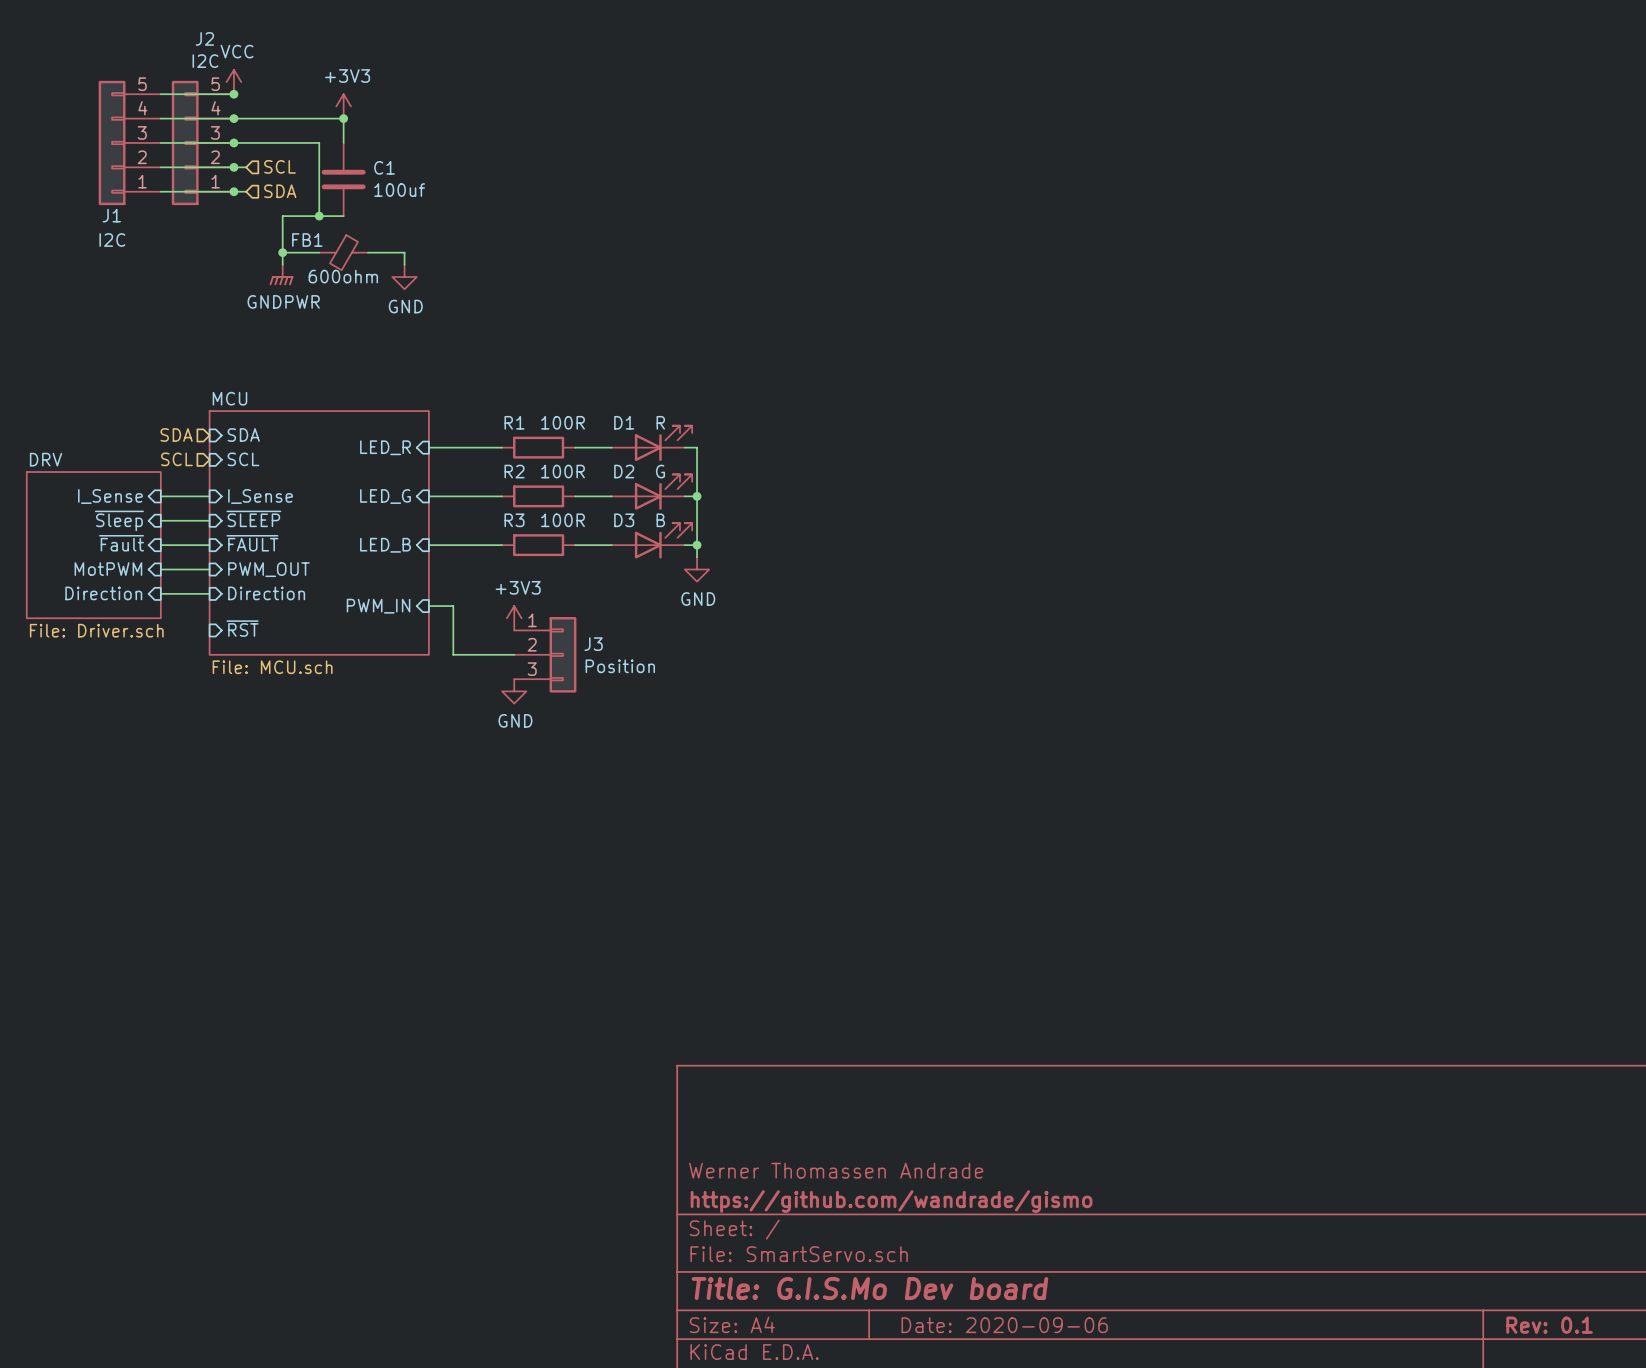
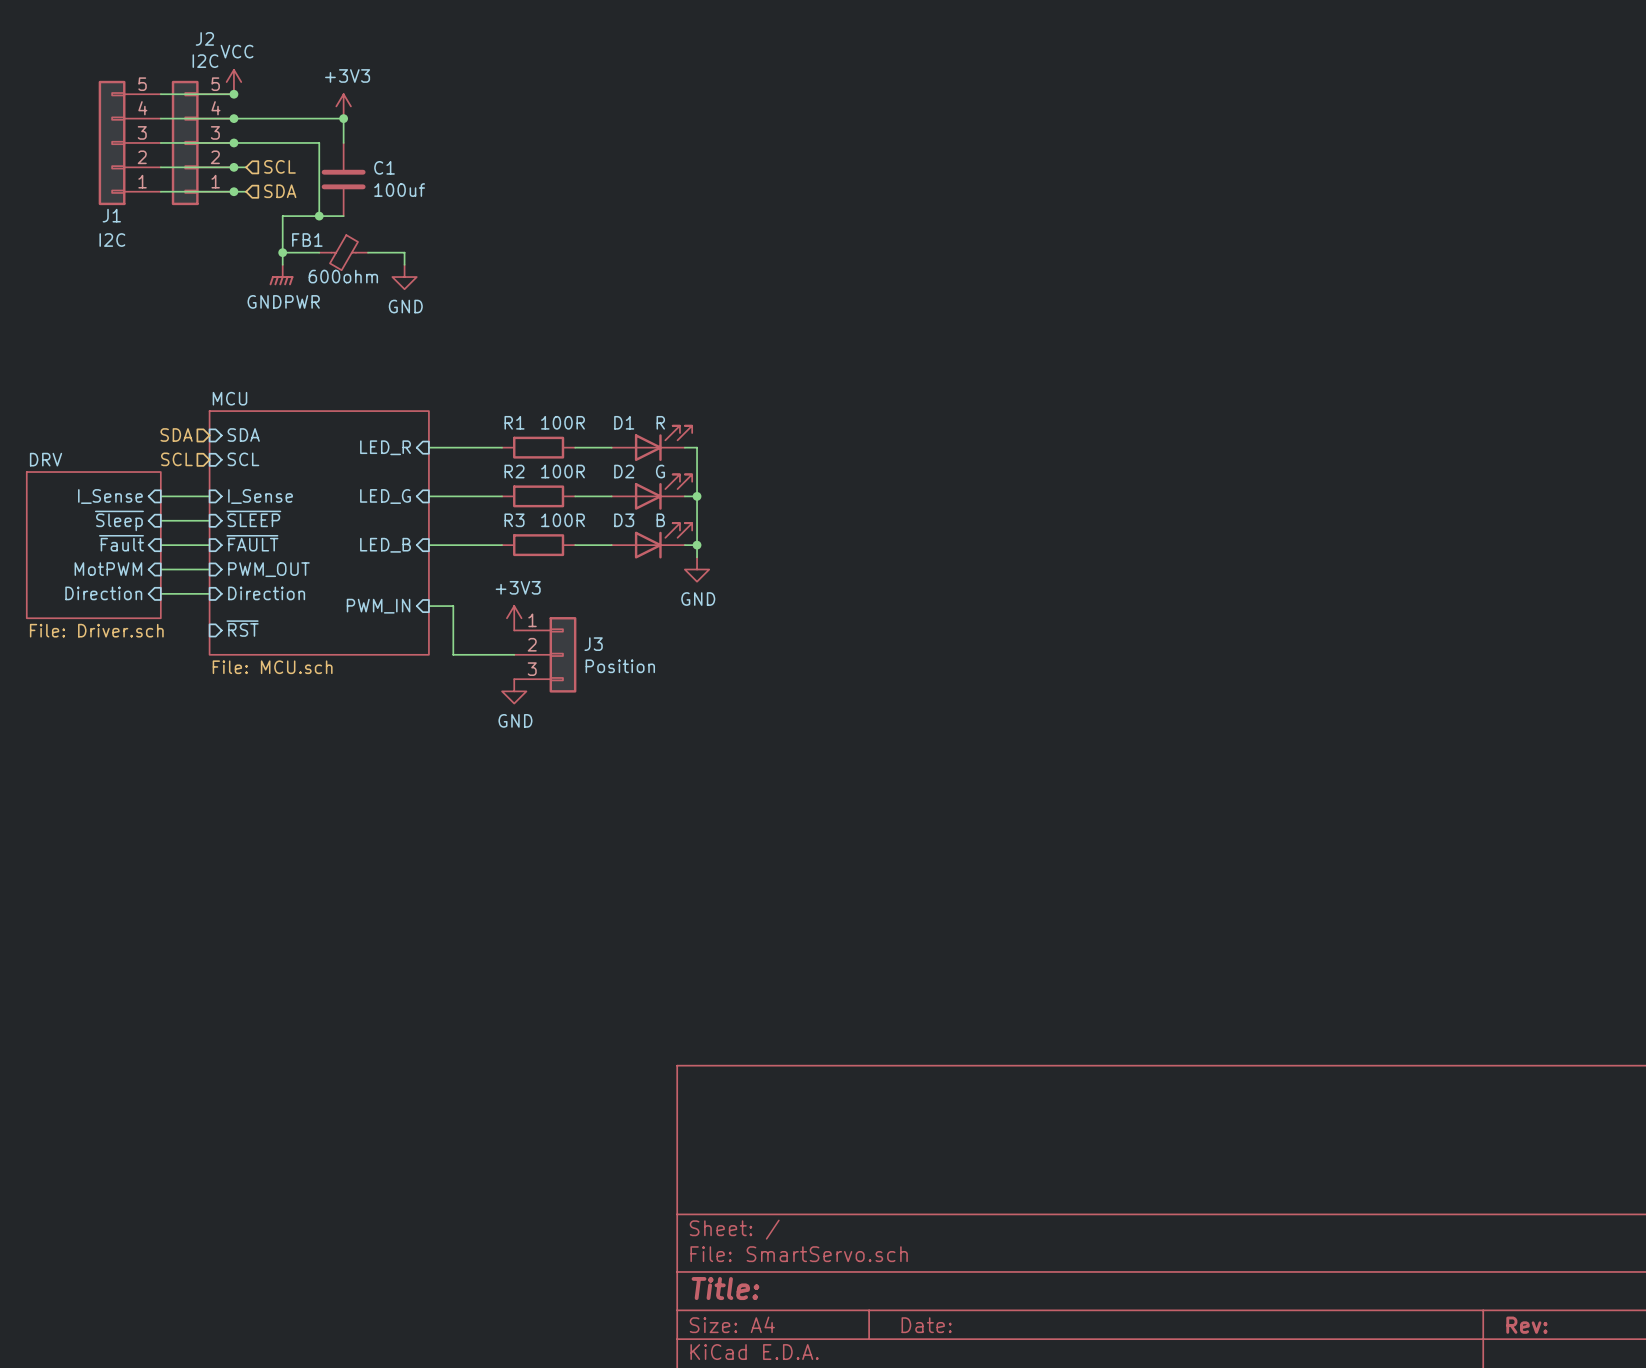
title block: Werner Thomassen Andrade (836, 1170) -> none
title block: https://github.com/wandrade/gismo (891, 1201) -> none
title block: Title: G.I.S.Mo Dev board (869, 1288) -> Title: (725, 1288)
title block: Date: 2020-09-06 (1004, 1325) -> Date: (926, 1325)
title block: Rev: 0.1 (1549, 1325) -> Rev: (1526, 1325)

